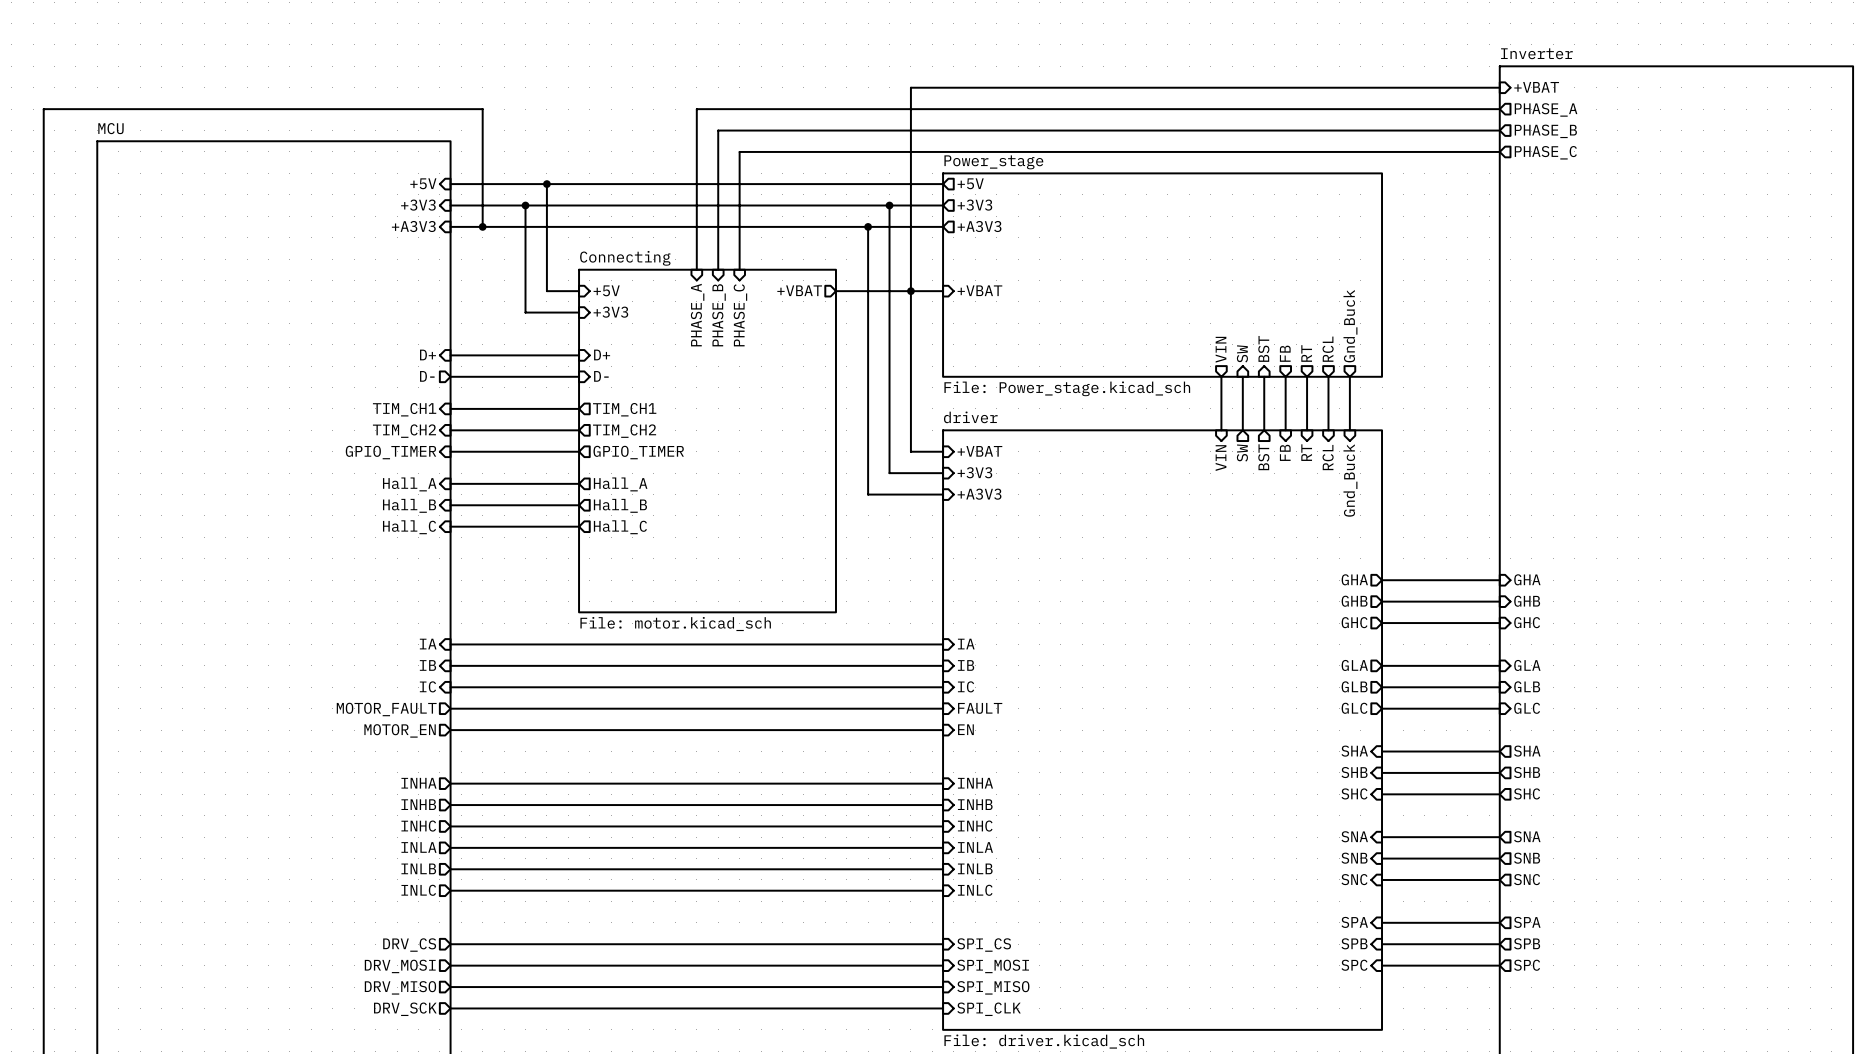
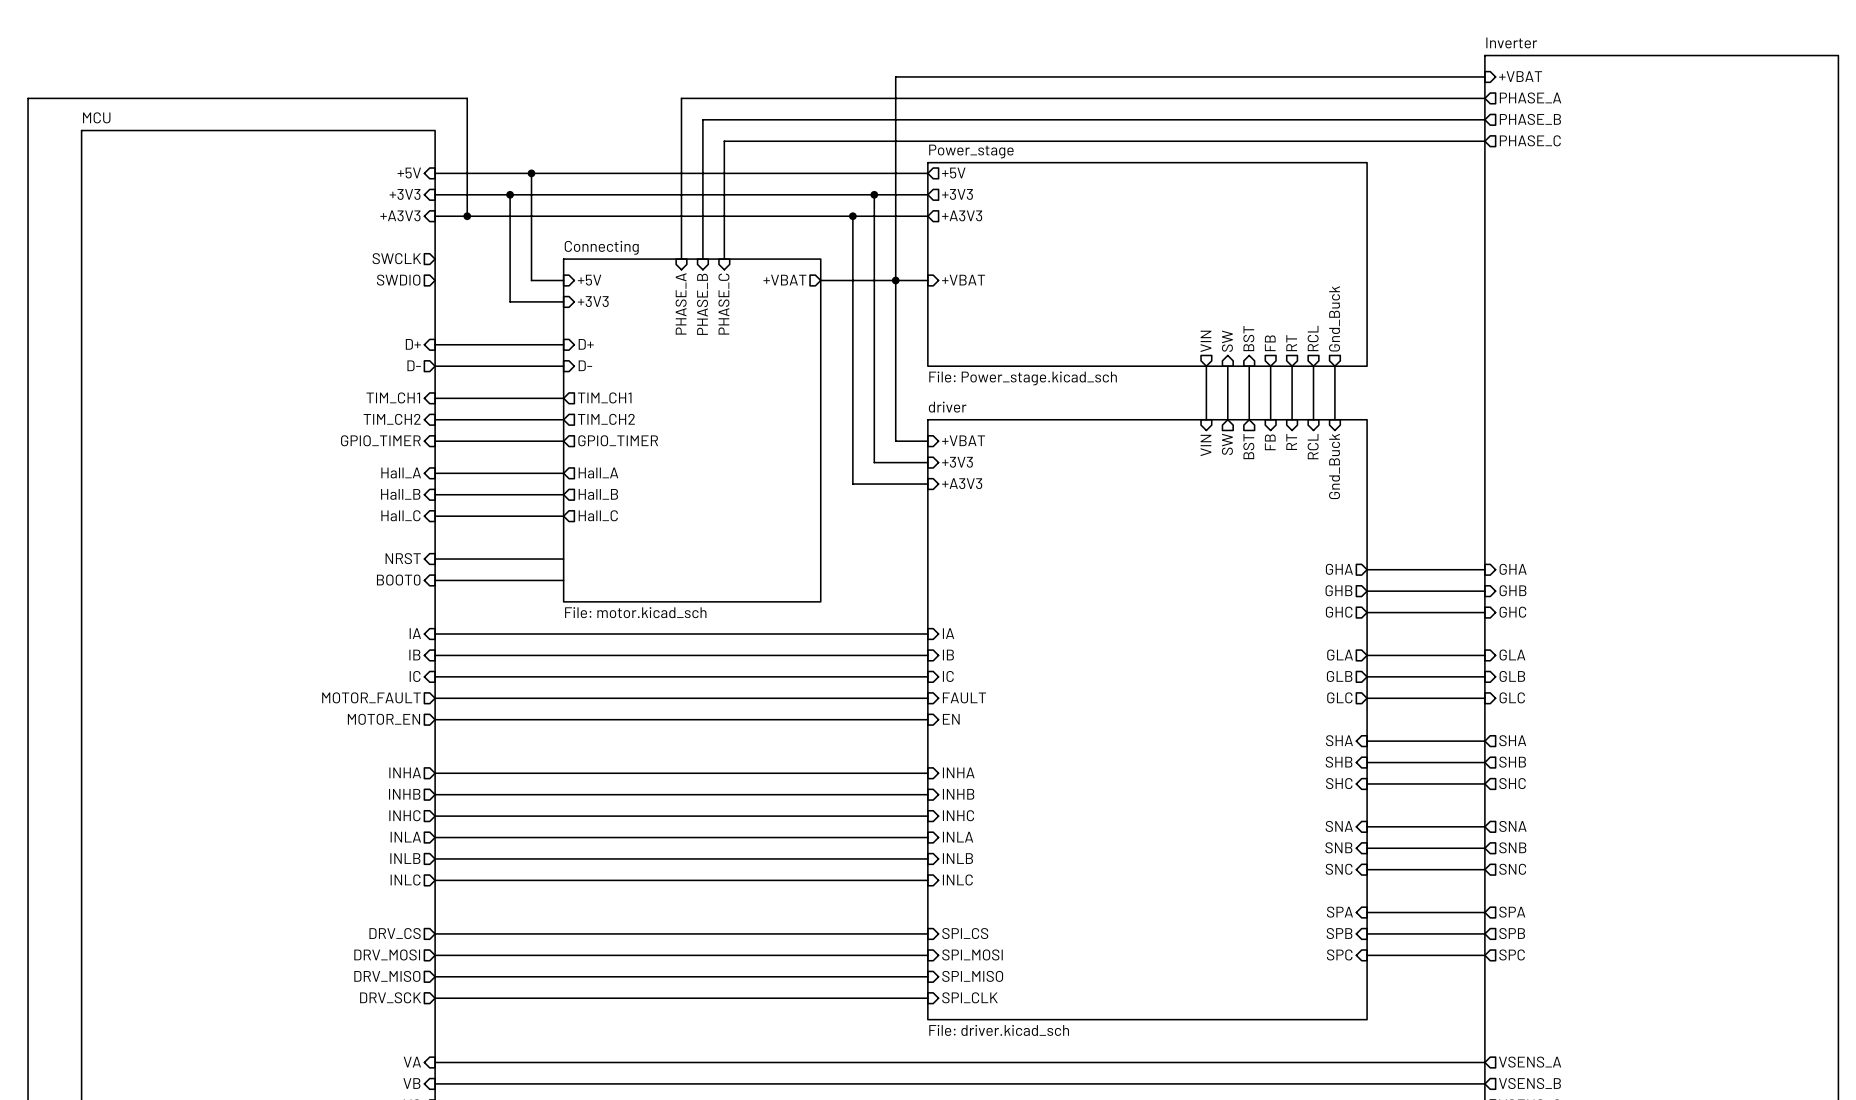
sheet pin: none -> SWCLK (396, 258)
sheet pin: none -> SWDIO (398, 280)
sheet pin: none -> NRST (403, 558)
wire: none -> (435, 559) (563, 559)
sheet pin: none -> BOOT0 (398, 580)
wire: none -> (435, 580) (563, 580)

